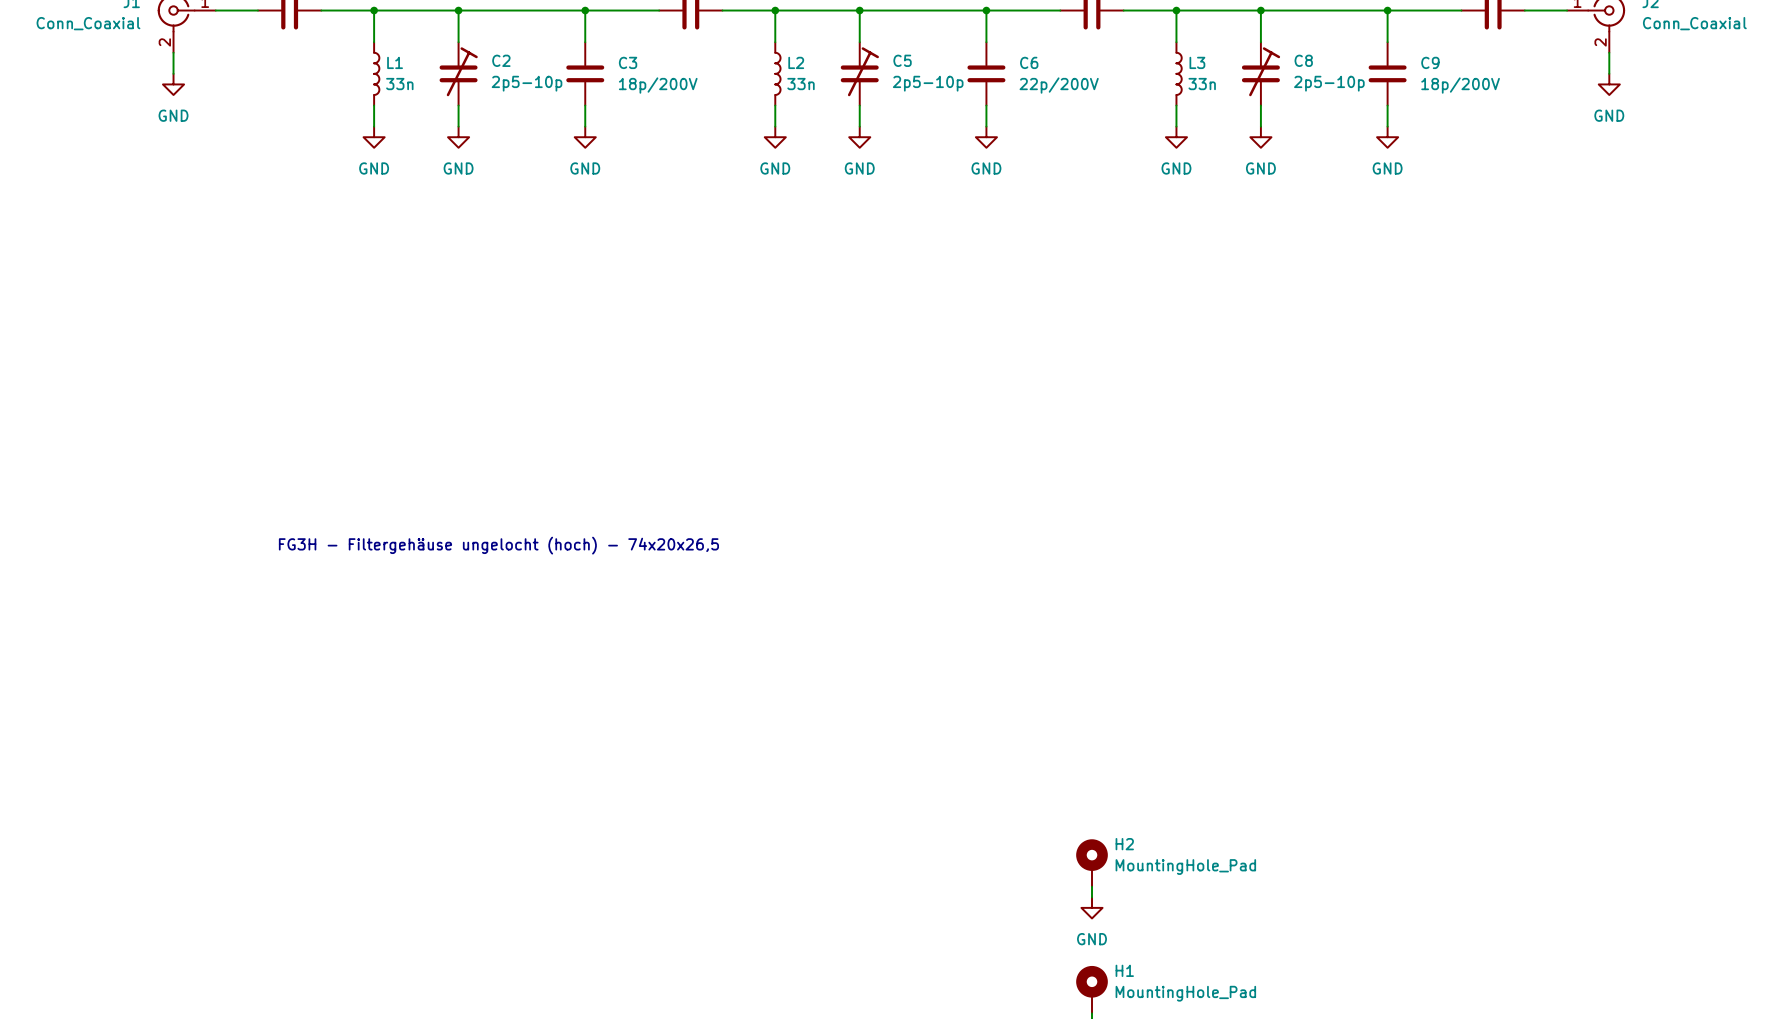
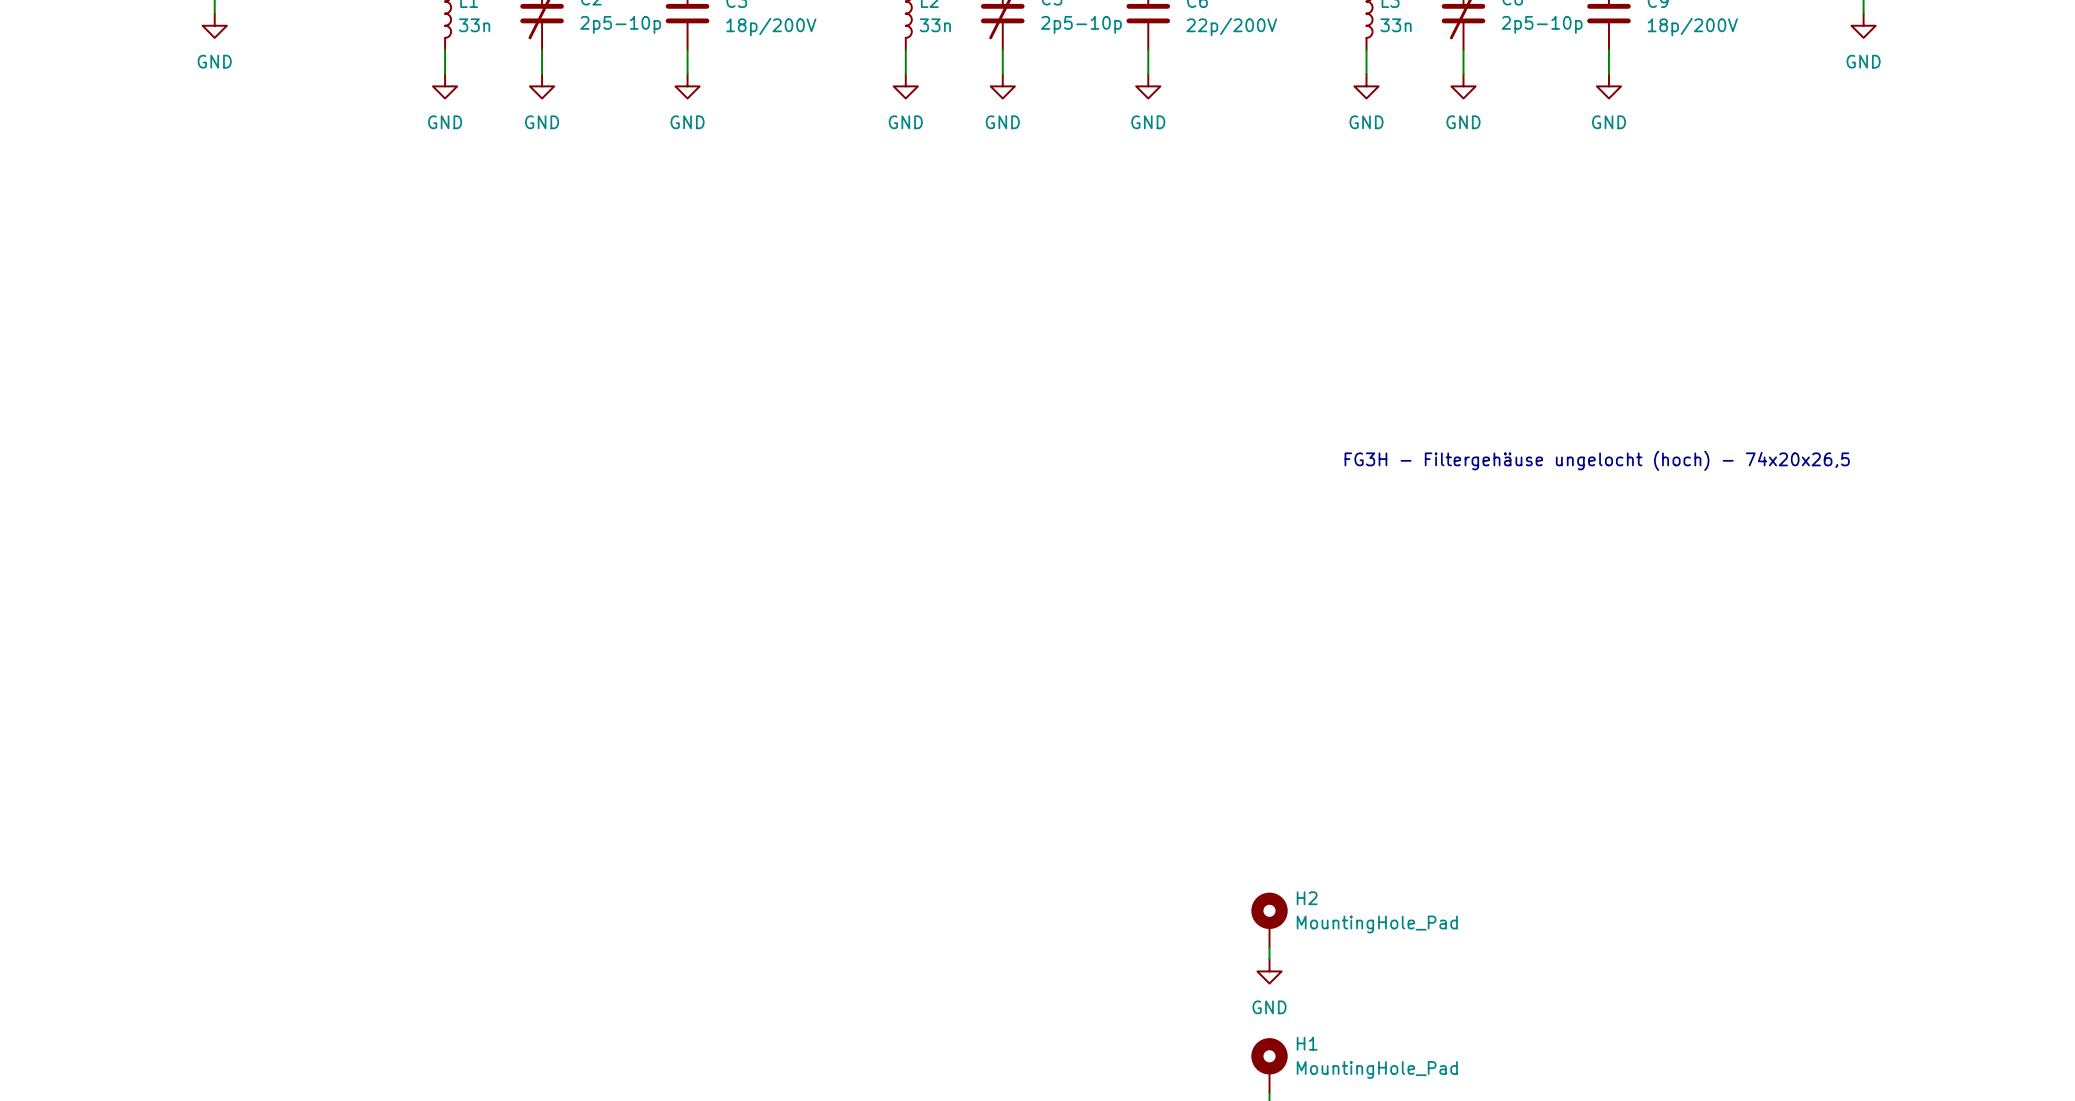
text: none -> FG3H - Filtergehäuse ungelocht (hoch) - 74x20x26,5 (1597, 460)
text: FG3H - Filtergehäuse ungelocht (hoch) - 74x20x26,5 (498, 545) -> none

